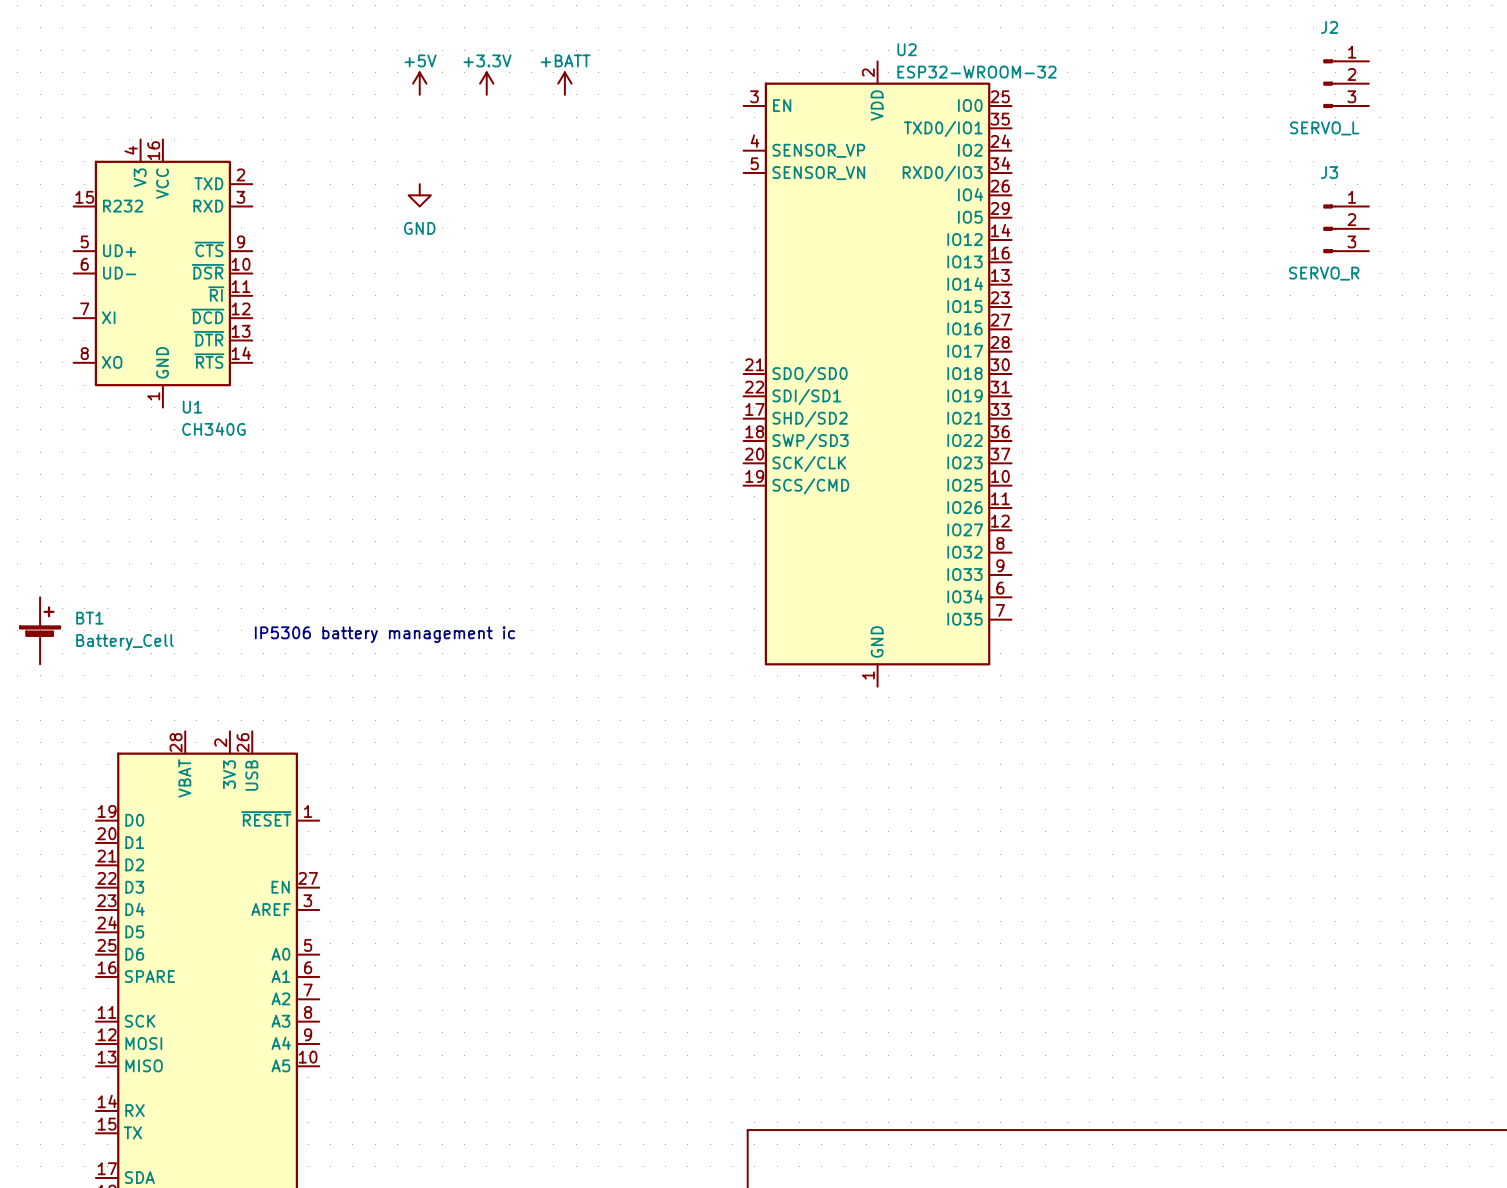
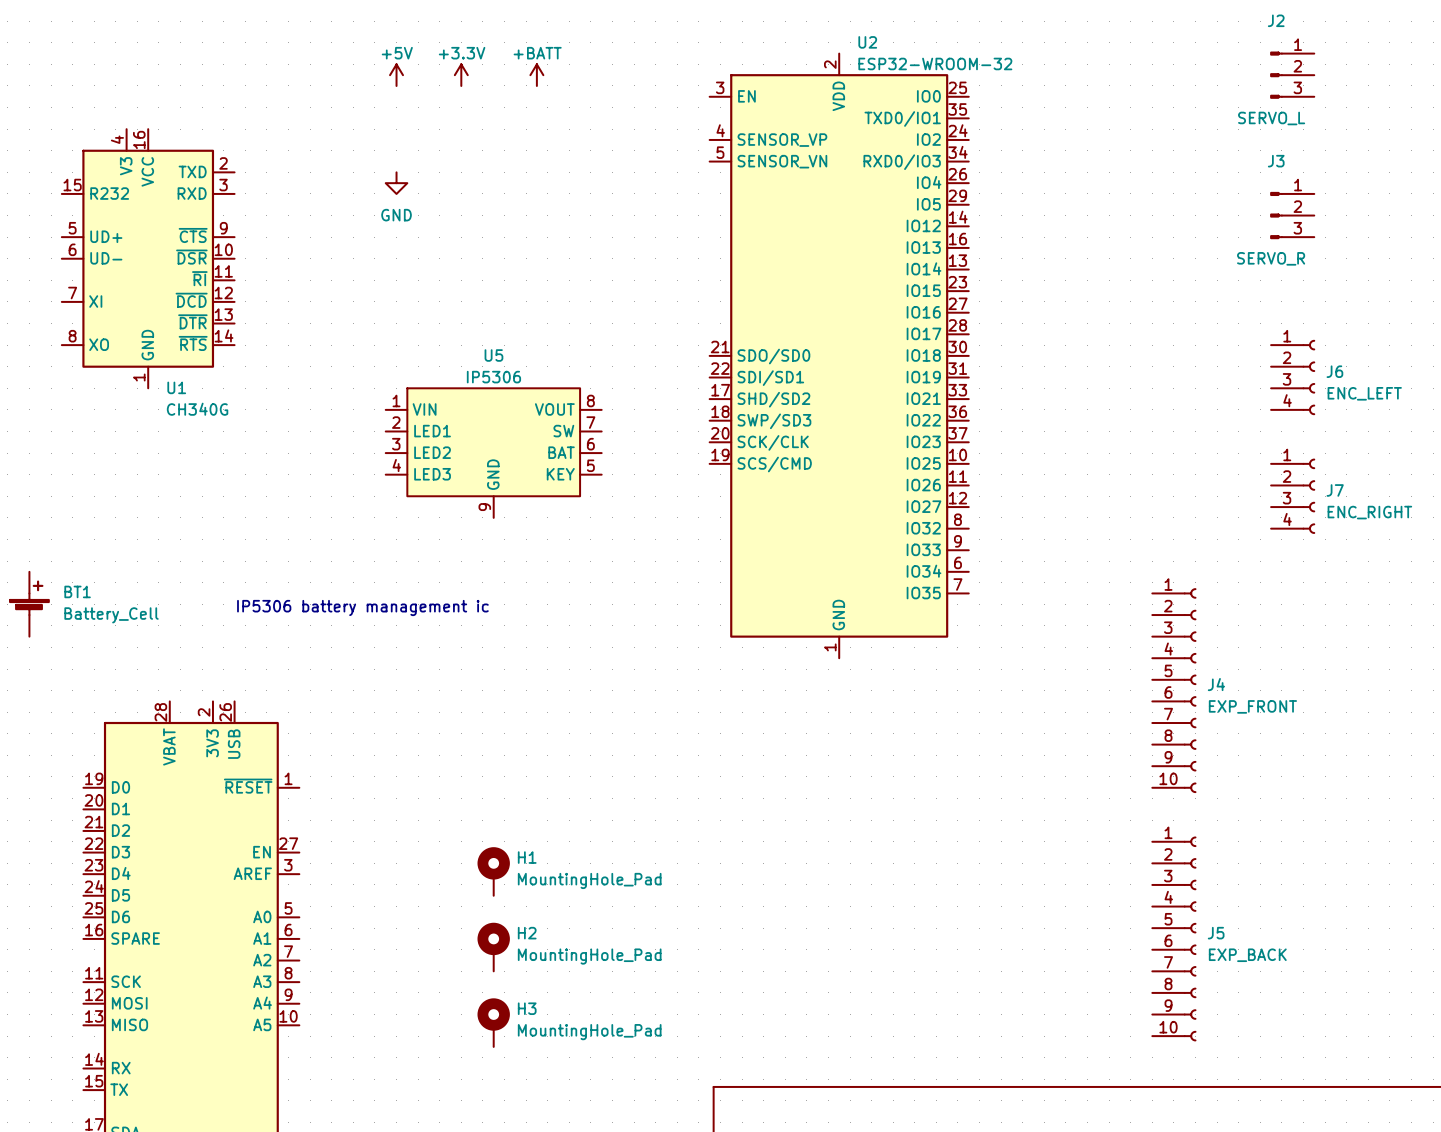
J6: none -> ENC_LEFT (1293, 377)
U5: none -> IP5306 (493, 453)
J7: none -> ENC_RIGHT (1293, 496)
J4: none -> EXP_FRONT (1174, 690)
H1: none -> MountingHole_Pad (493, 871)
J5: none -> EXP_BACK (1174, 938)
H2: none -> MountingHole_Pad (493, 947)
H3: none -> MountingHole_Pad (493, 1022)

